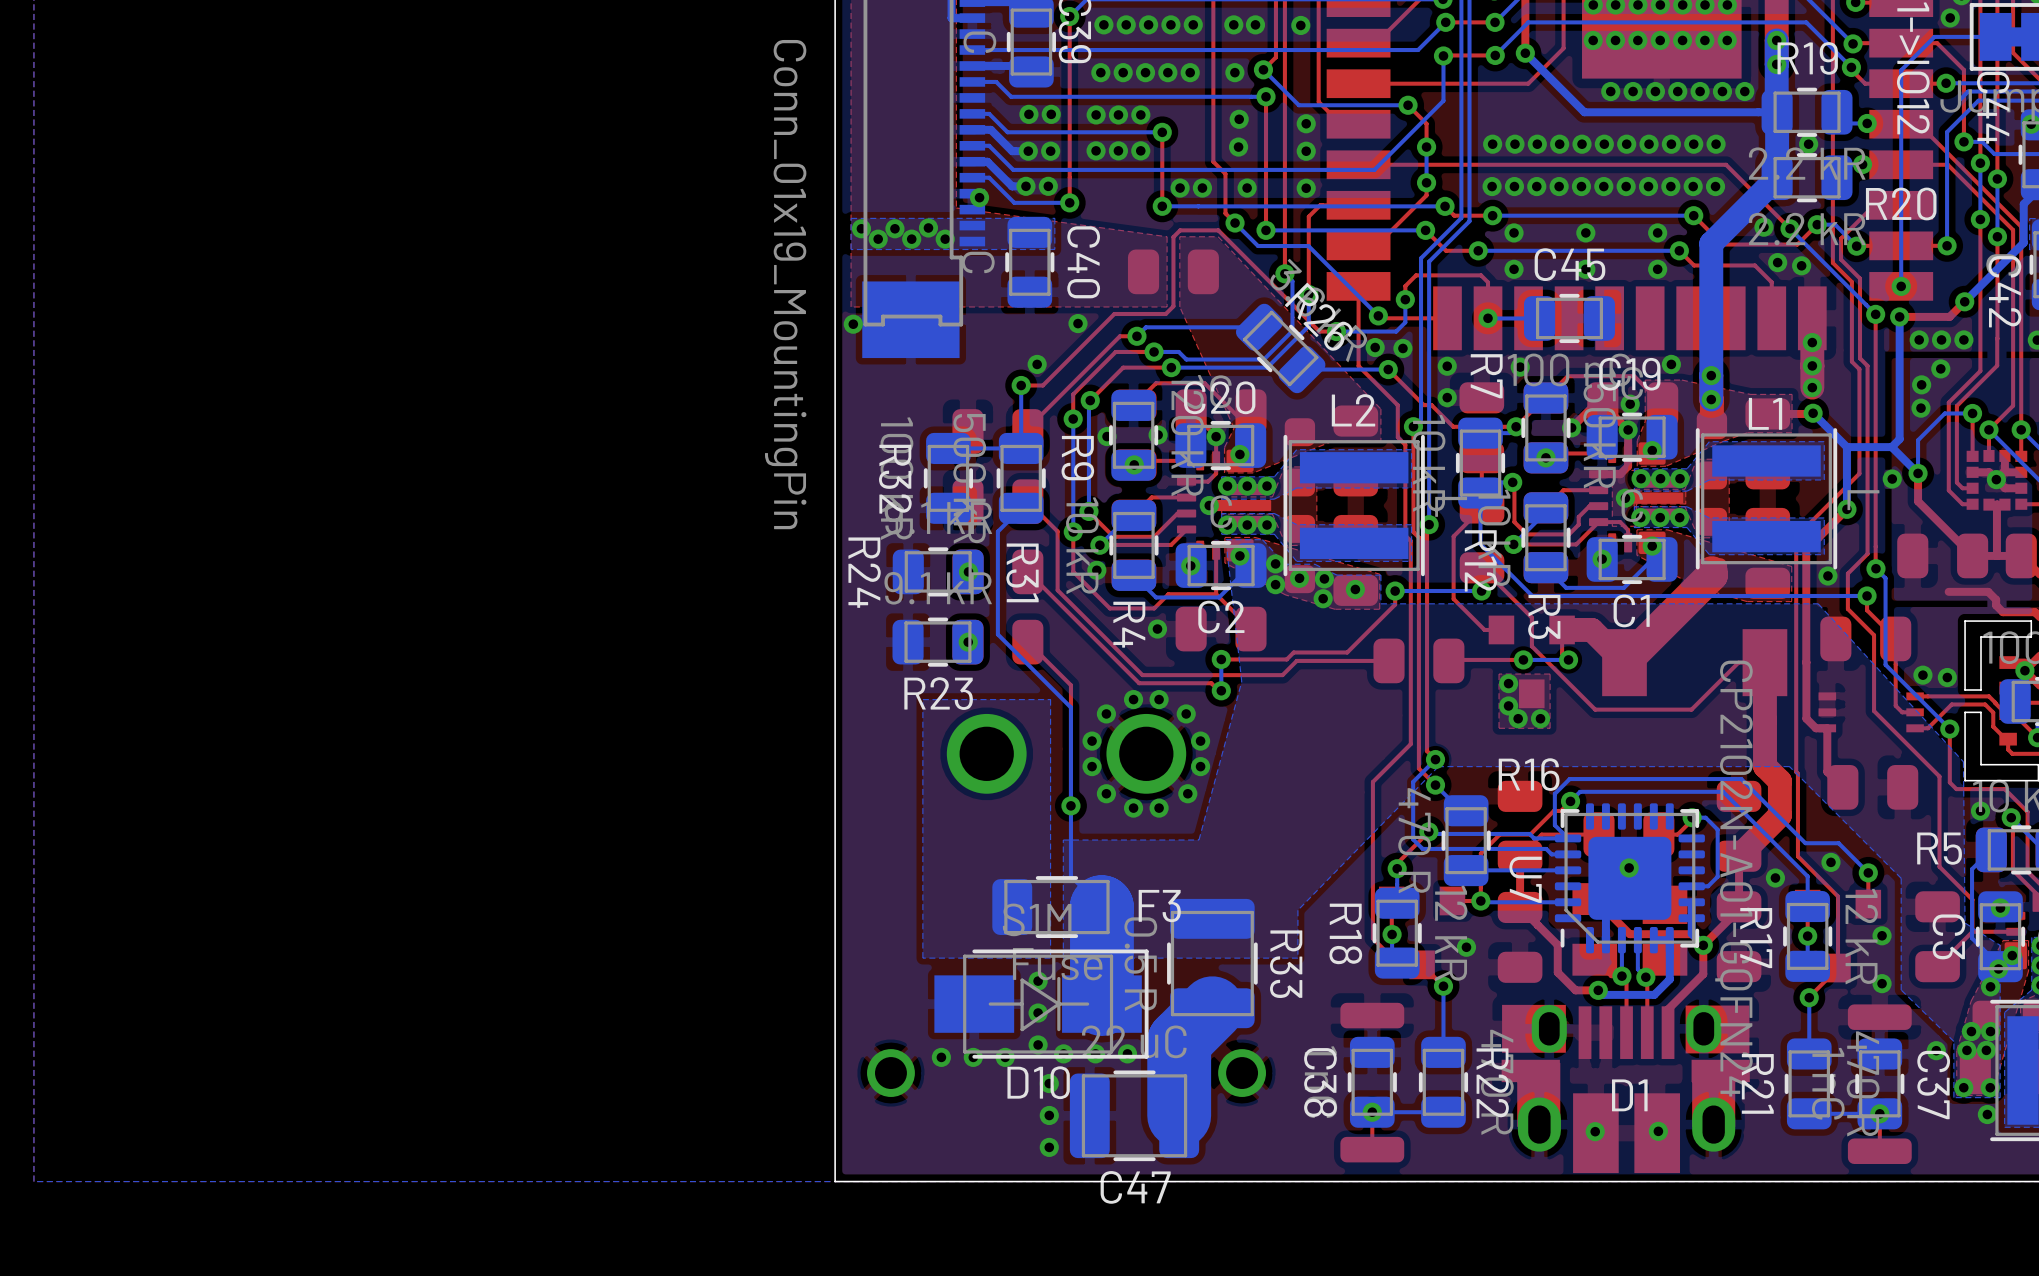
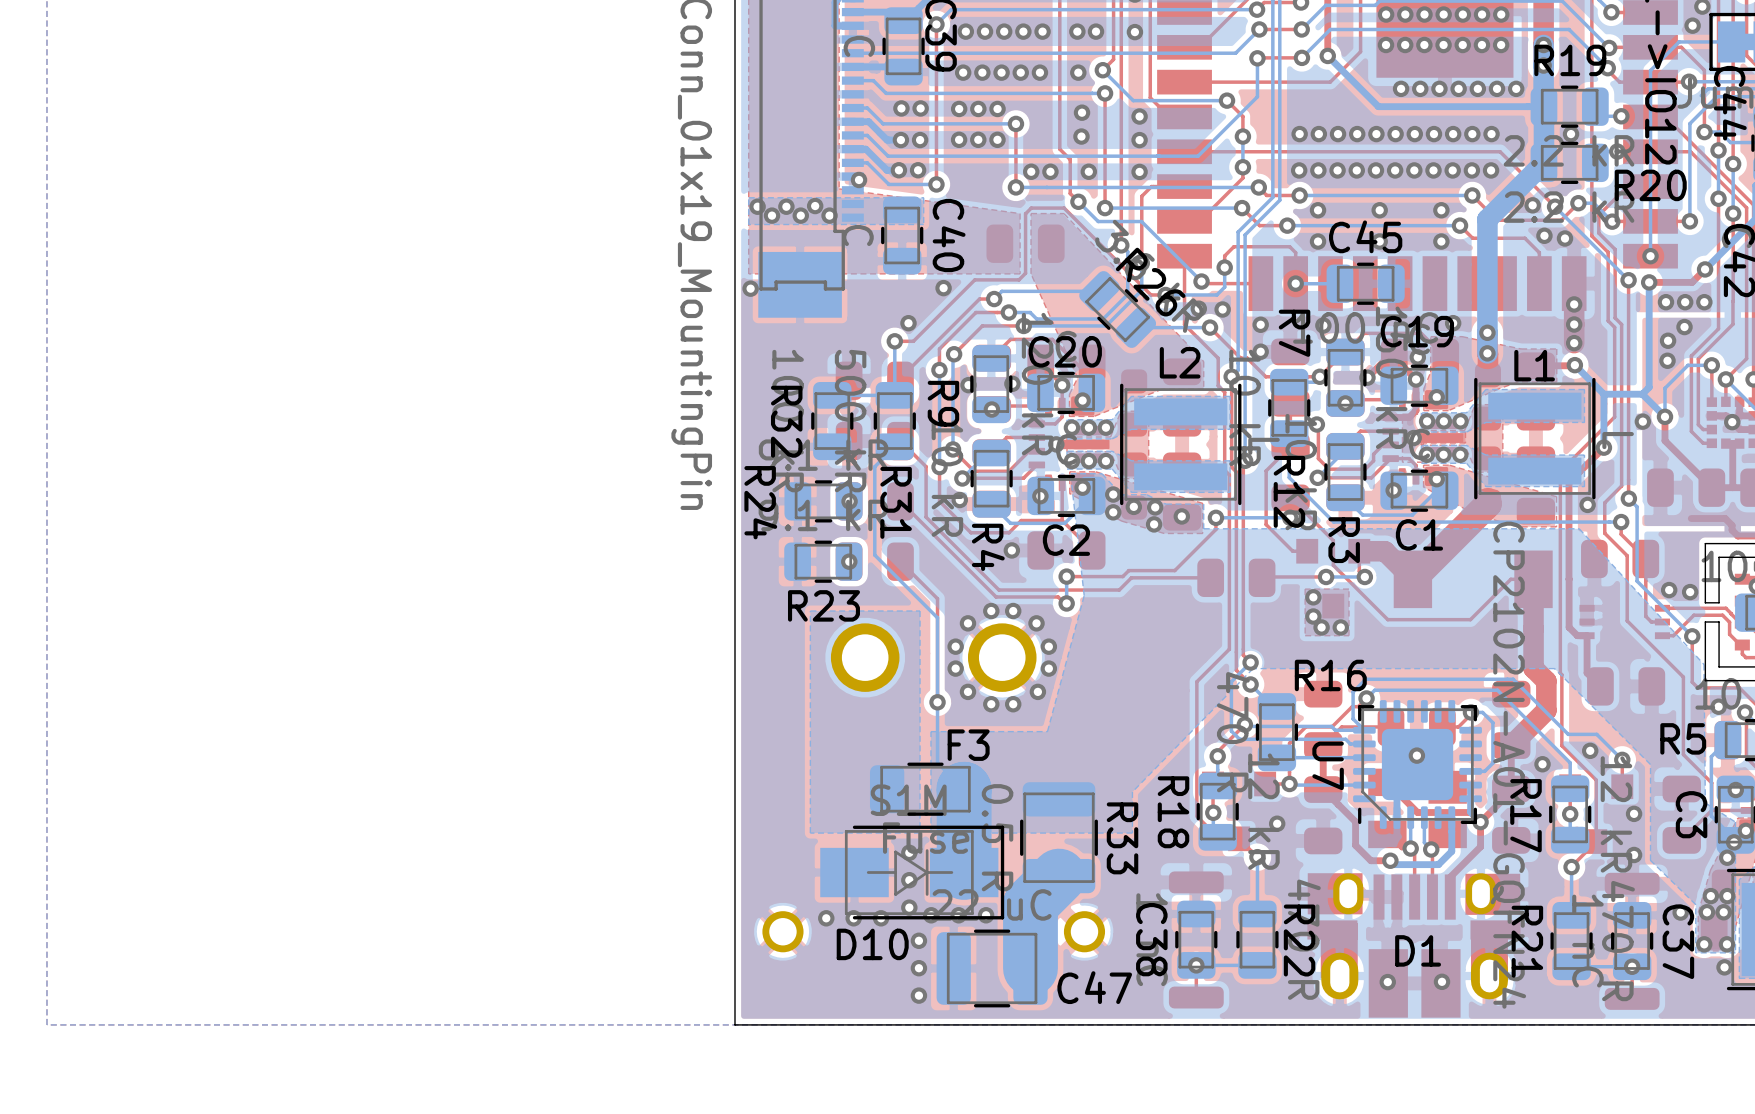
F3 name position: F3 (1159, 906) -> F3 (968, 745)
D10 name position: D10 (1038, 1082) -> D10 (872, 944)
C47 name position: C47 (1135, 1187) -> C47 (1094, 987)

